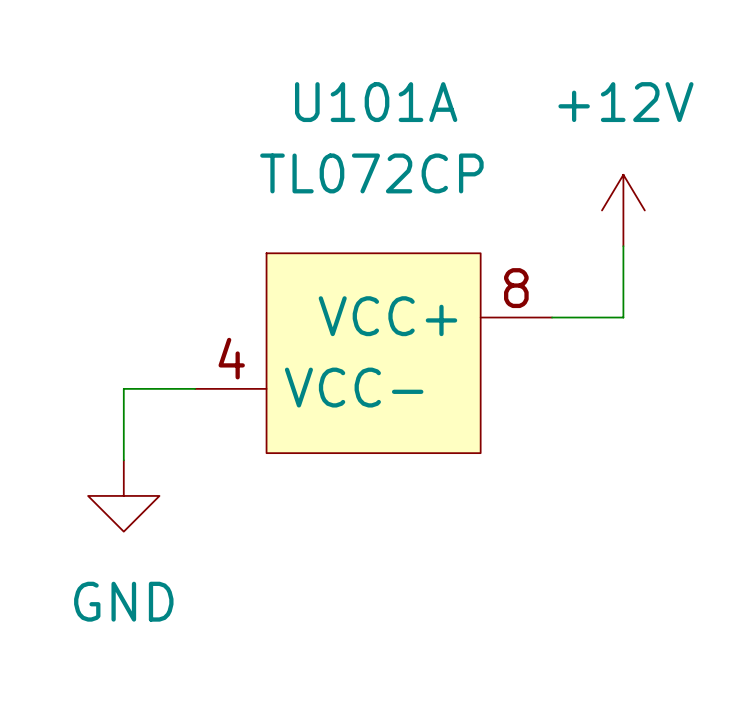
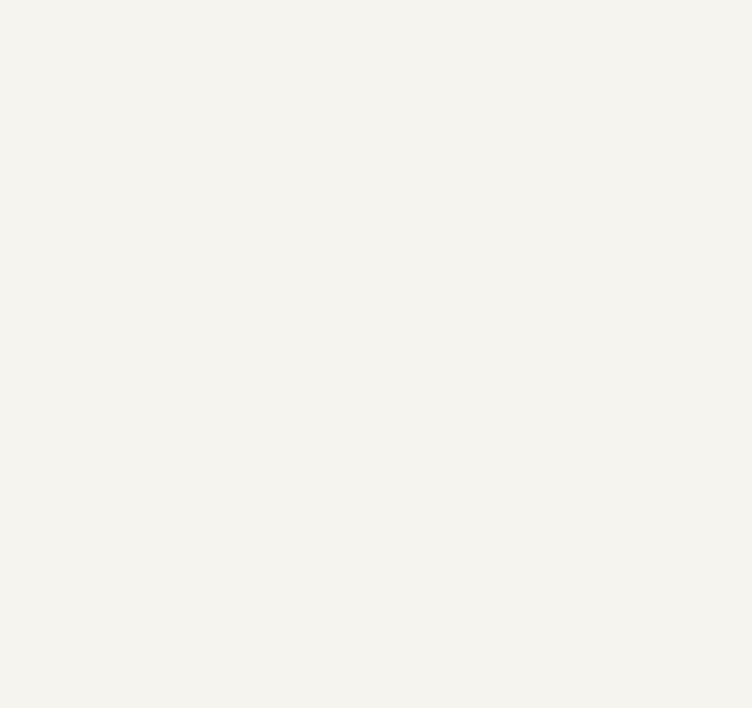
power symbol: +12V (623, 210) -> none
wire: (623, 246) (623, 317) (552, 317) -> none
U101A: TL072CP (373, 353) -> none
wire: (195, 388) (123, 388) (123, 460) -> none
power symbol: GND (123, 495) -> none

